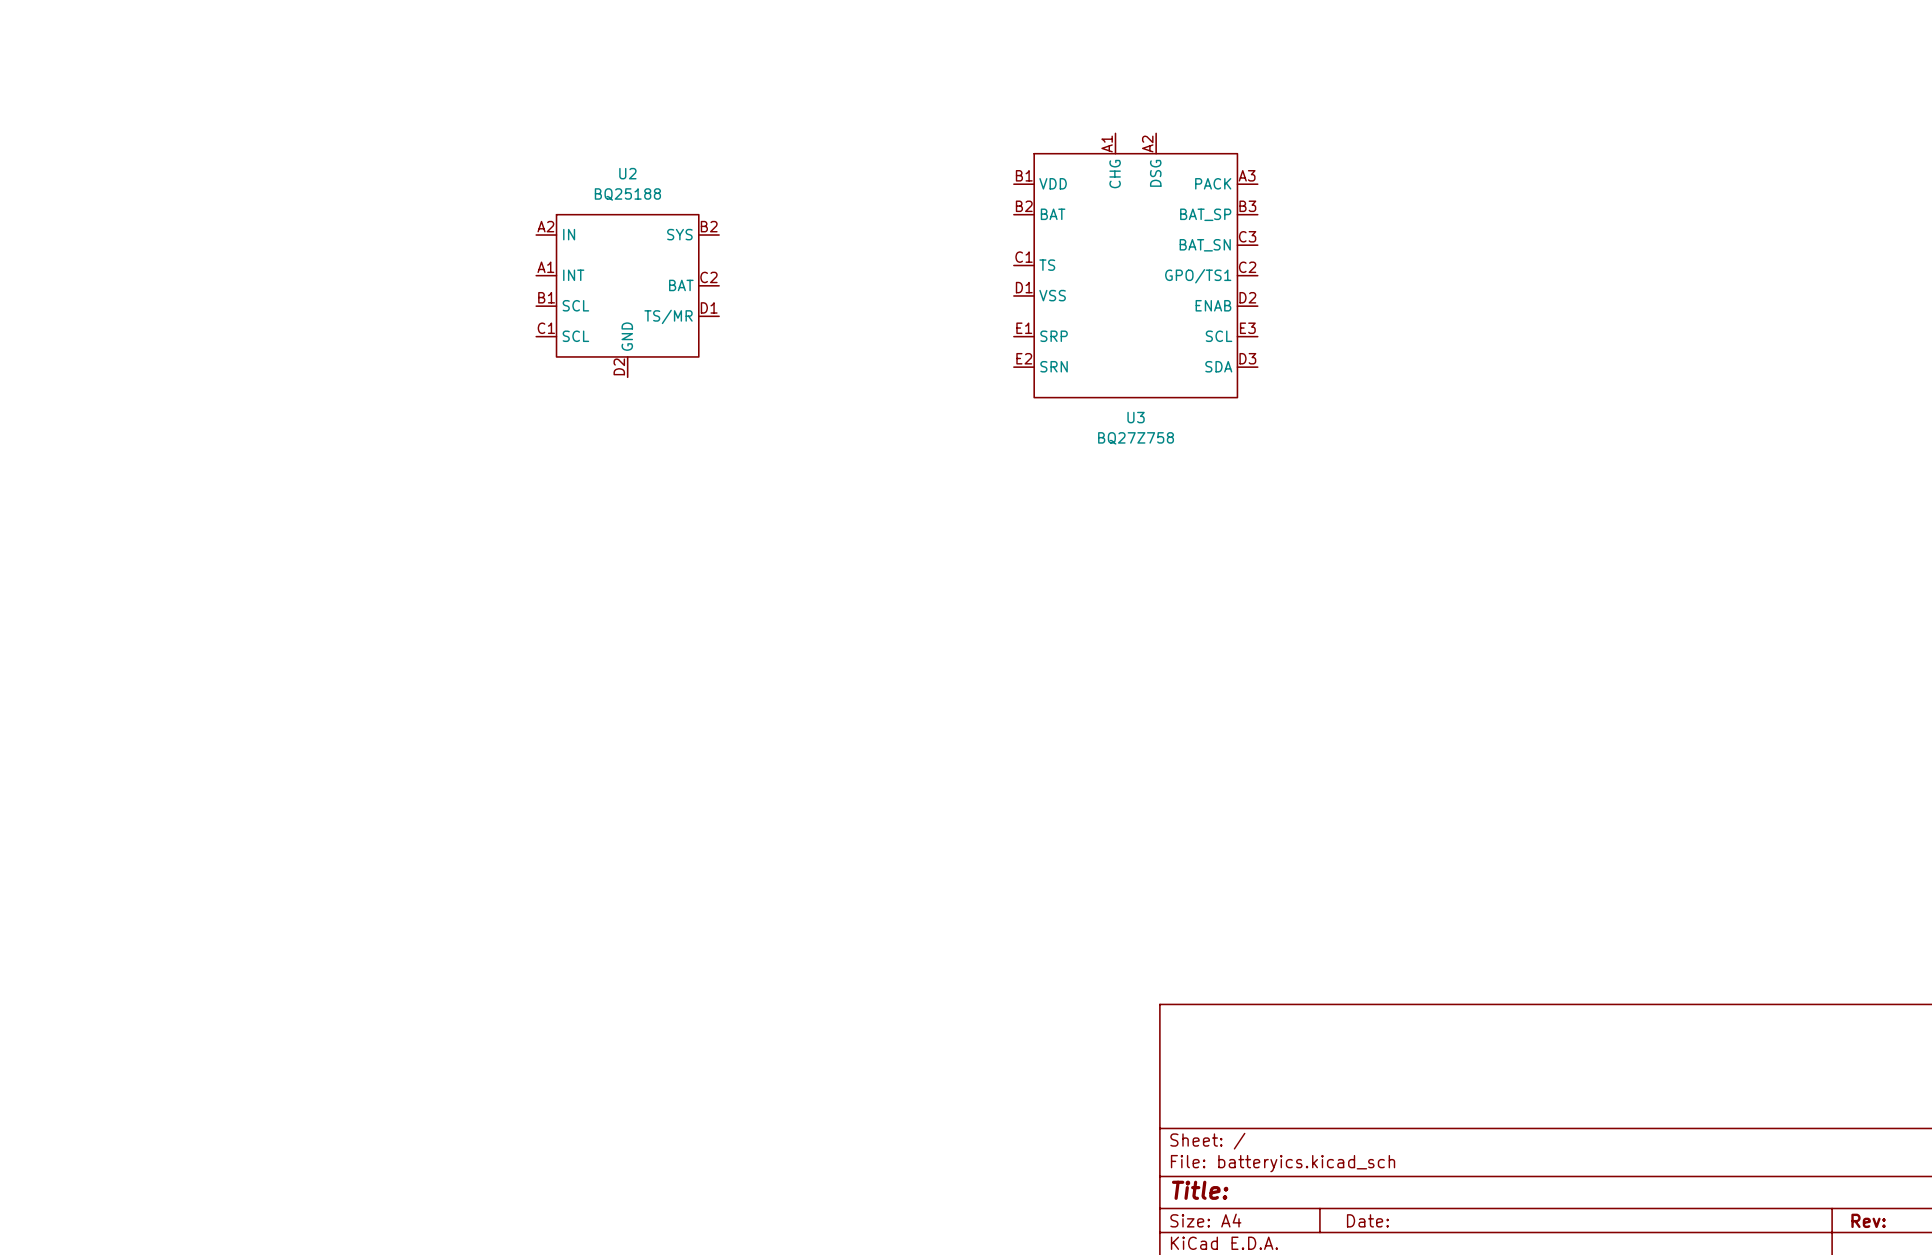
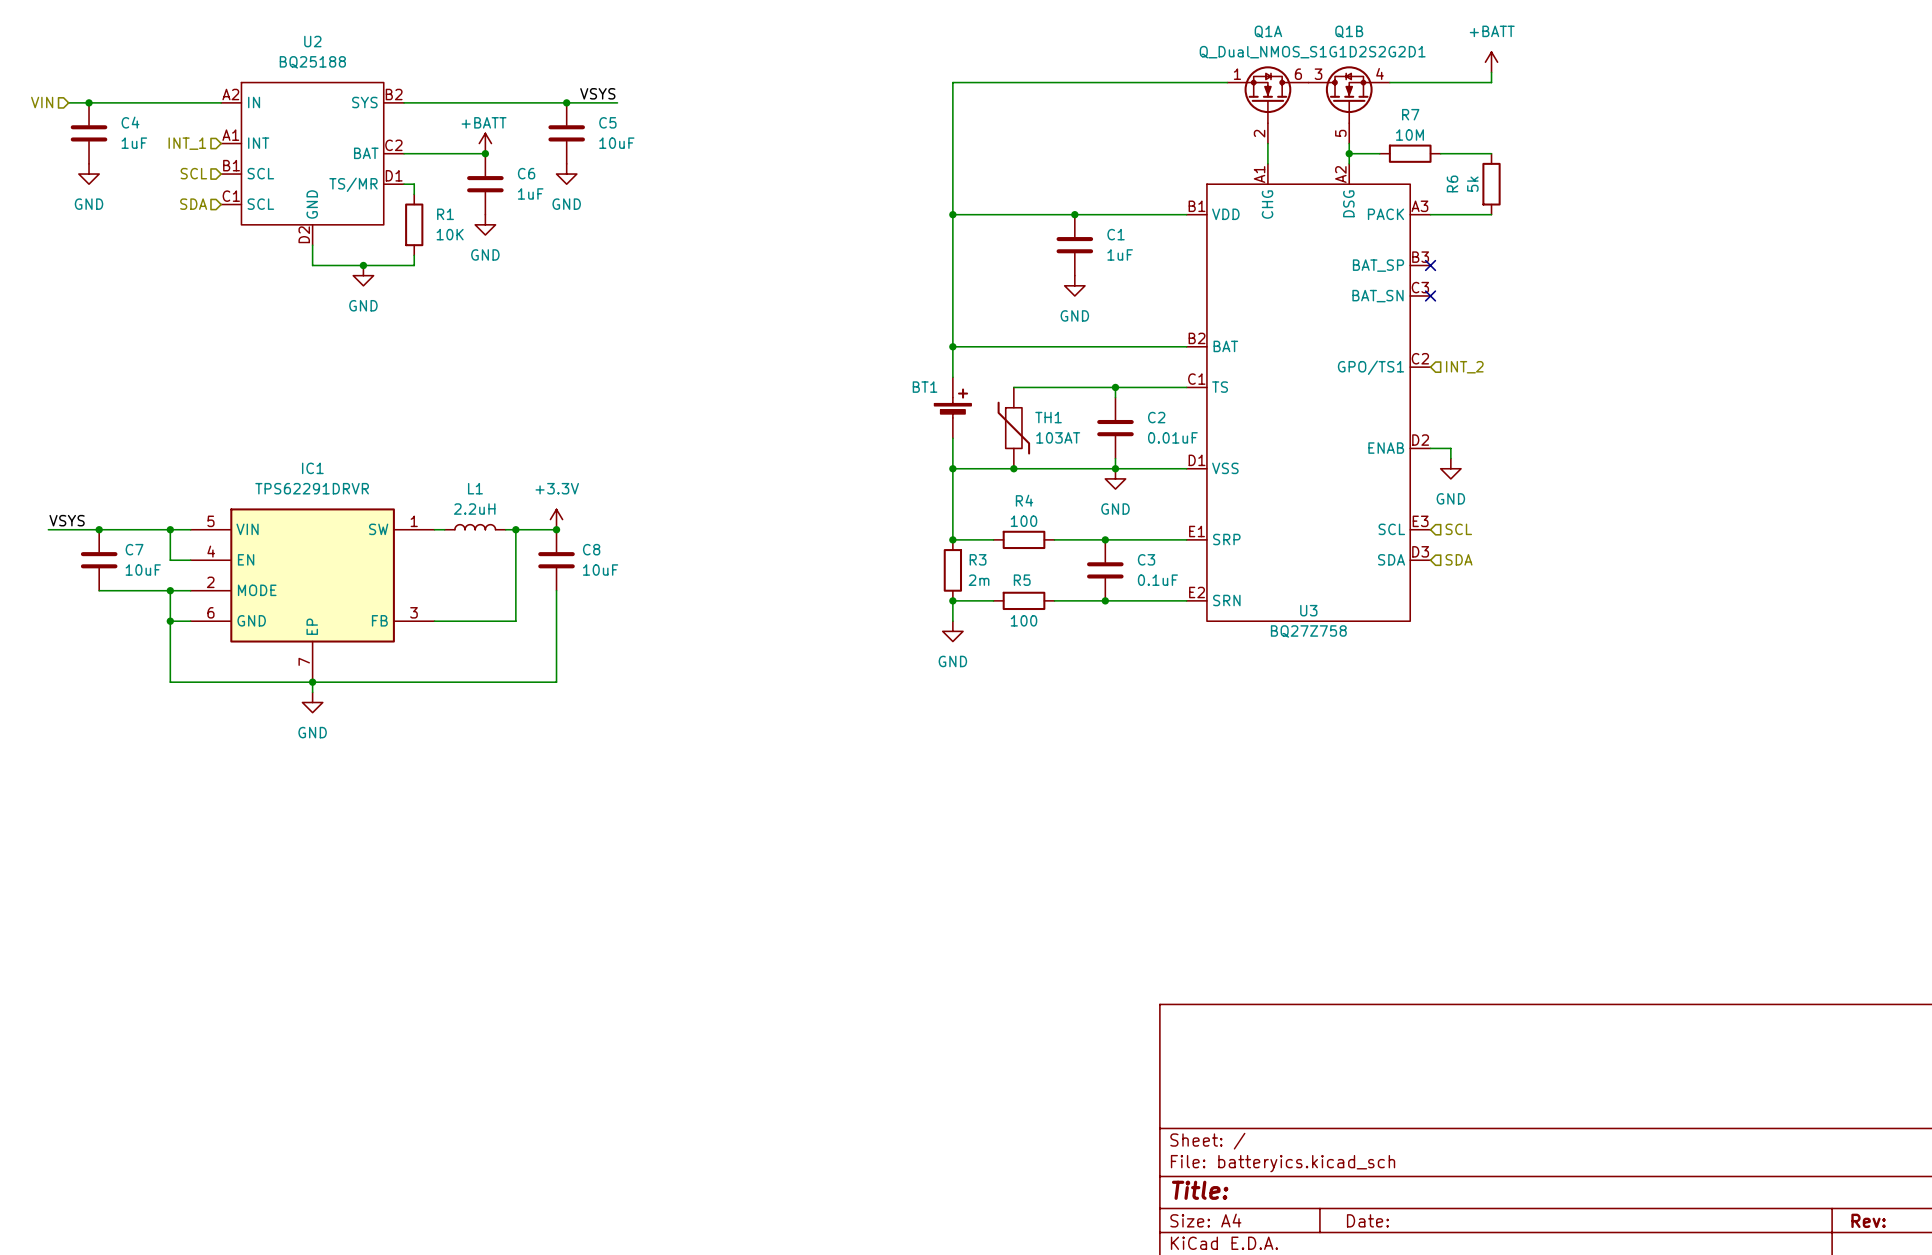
power symbol: none -> +BATT (1491, 62)
wire: none -> (1491, 72) (1491, 82) (1389, 82)
wire: none -> (1227, 82) (952, 82) (952, 377)
label: none -> VSYS (597, 93)
hierarchical label: none -> VIN (42, 102)
wire: none -> (68, 102) (221, 102)
junction: none -> (89, 102)
wire: none -> (404, 102) (617, 102)
junction: none -> (566, 102)
Q1A: none -> Q_Dual_NMOS_S1G1D2S2G2D1 (1267, 104)
Q1B: none -> (1349, 104)
C4: none -> 1uF (89, 133)
C5: none -> 10uF (566, 133)
U3 symbol: [1013, 133, 1258, 398] -> [1186, 163, 1431, 622]
hierarchical label: none -> INT_1 (187, 143)
power symbol: none -> +BATT (485, 143)
wire: none -> (1267, 143) (1267, 163)
wire: none -> (1349, 143) (1349, 163)
wire: none -> (404, 153) (485, 153)
junction: none -> (485, 153)
wire: none -> (1349, 153) (1379, 153)
junction: none -> (1349, 153)
R7: none -> 10M (1410, 153)
wire: none -> (1440, 153) (1491, 153)
hierarchical label: none -> SCL (193, 173)
power symbol: none -> GND (89, 174)
power symbol: none -> GND (566, 174)
wire: none -> (404, 184) (414, 184) (414, 194)
C6: none -> 1uF (485, 184)
R6: none -> 5k (1491, 184)
hierarchical label: none -> SDA (193, 204)
wire: none -> (952, 214) (1186, 214)
junction: none -> (952, 214)
junction: none -> (1074, 214)
wire: none -> (1430, 214) (1491, 214)
R1: none -> 10K (414, 224)
power symbol: none -> GND (485, 224)
wire: none -> (312, 245) (312, 265) (414, 265) (414, 255)
C1: none -> 1uF (1074, 245)
junction: none -> (363, 265)
no-connect mark: none -> (1430, 265)
power symbol: none -> GND (363, 275)
power symbol: none -> GND (1074, 285)
U2 position: (627, 295) -> (312, 163)
no-connect mark: none -> (1430, 295)
wire: none -> (952, 346) (1186, 346)
junction: none -> (952, 346)
hierarchical label: none -> INT_2 (1464, 367)
wire: none -> (1013, 387) (1186, 387)
wire: none -> (1115, 387) (1115, 397)
junction: none -> (1115, 387)
BT1: none -> (952, 407)
U3 name position: U3 (1136, 417) -> U3 (1308, 610)
TH1: none -> 103AT (1013, 428)
C2: none -> 0.01uF (1115, 428)
wire: none -> (952, 438) (952, 539) (993, 539)
U3 value position: BQ27Z758 (1136, 438) -> BQ27Z758 (1308, 631)
wire: none -> (1430, 448) (1450, 448) (1450, 458)
wire: none -> (1115, 458) (1115, 468)
wire: none -> (952, 468) (1186, 468)
junction: none -> (952, 468)
junction: none -> (1013, 468)
junction: none -> (1115, 468)
power symbol: none -> GND (1450, 468)
power symbol: none -> GND (1115, 478)
power symbol: none -> +3.3V (556, 519)
label: none -> VSYS (67, 520)
L1: none -> 2.2uH (475, 527)
wire: none -> (48, 529) (190, 529)
junction: none -> (99, 529)
wire: none -> (170, 529) (170, 560) (190, 560)
junction: none -> (170, 529)
wire: none -> (434, 529) (444, 529)
wire: none -> (505, 529) (556, 529)
wire: none -> (515, 529) (515, 621) (434, 621)
junction: none -> (515, 529)
junction: none -> (556, 529)
hierarchical label: none -> SCL (1458, 529)
junction: none -> (952, 539)
R4: none -> 100 (1024, 539)
wire: none -> (1054, 539) (1186, 539)
junction: none -> (1105, 539)
hierarchical label: none -> SDA (1459, 559)
C7: none -> 10uF (99, 560)
C8: none -> 10uF (556, 560)
R3: none -> 2m (952, 570)
C3: none -> 0.1uF (1105, 570)
wire: none -> (99, 590) (190, 590)
wire: none -> (170, 590) (170, 682) (556, 682) (556, 590)
junction: none -> (170, 590)
IC1: none -> TPS62291DRVR (312, 595)
junction: none -> (952, 600)
wire: none -> (993, 600) (952, 600) (952, 621)
R5: none -> 100 (1024, 600)
wire: none -> (1054, 600) (1186, 600)
junction: none -> (1105, 600)
wire: none -> (170, 621) (190, 621)
junction: none -> (170, 621)
power symbol: none -> GND (952, 631)
wire: none -> (312, 682) (312, 692)
junction: none -> (312, 682)
power symbol: none -> GND (312, 702)

